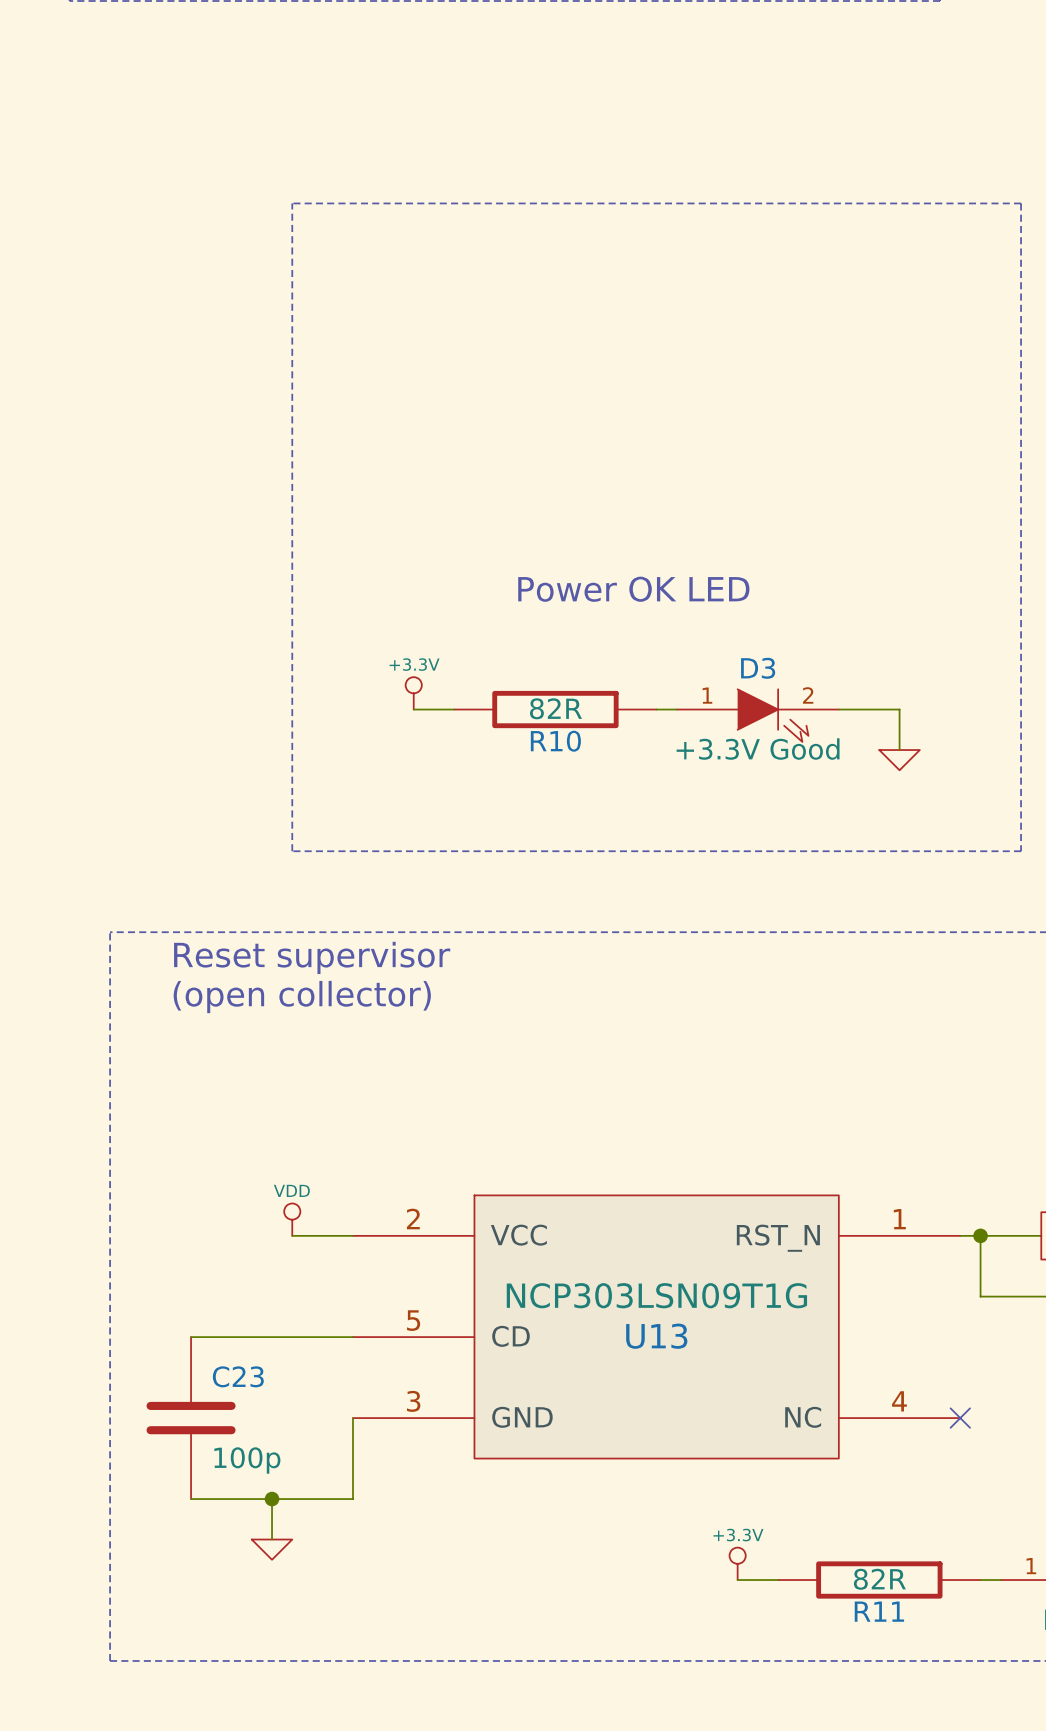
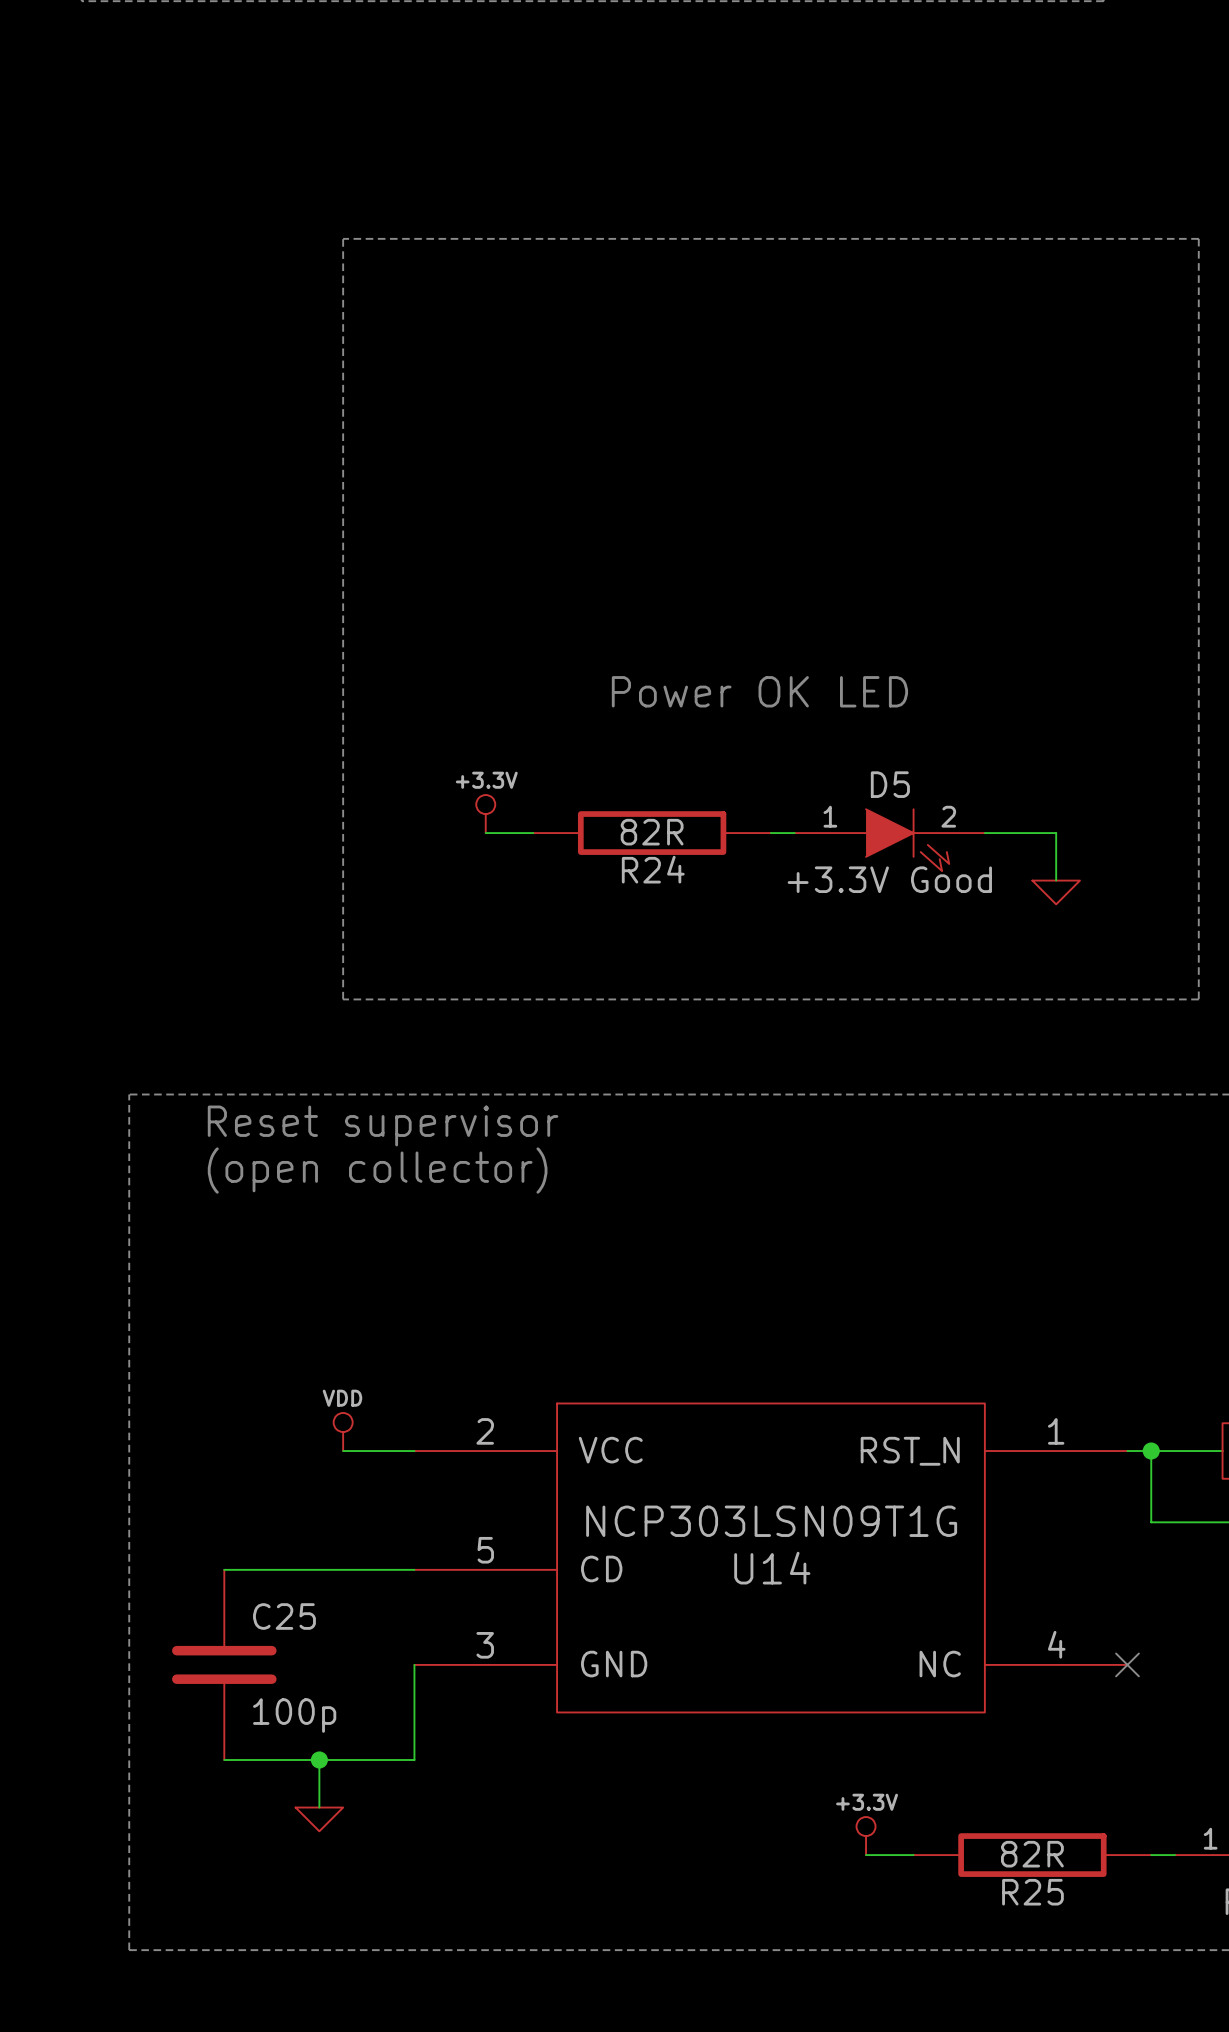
D3 name: D3 (758, 668) -> D5 (890, 784)
R10 name: R10 (555, 741) -> R24 (653, 869)
U13 name: U13 (656, 1336) -> U14 (772, 1568)
C23 name: C23 (238, 1376) -> C25 (284, 1616)
R11 name: R11 (879, 1611) -> R25 (1032, 1892)

